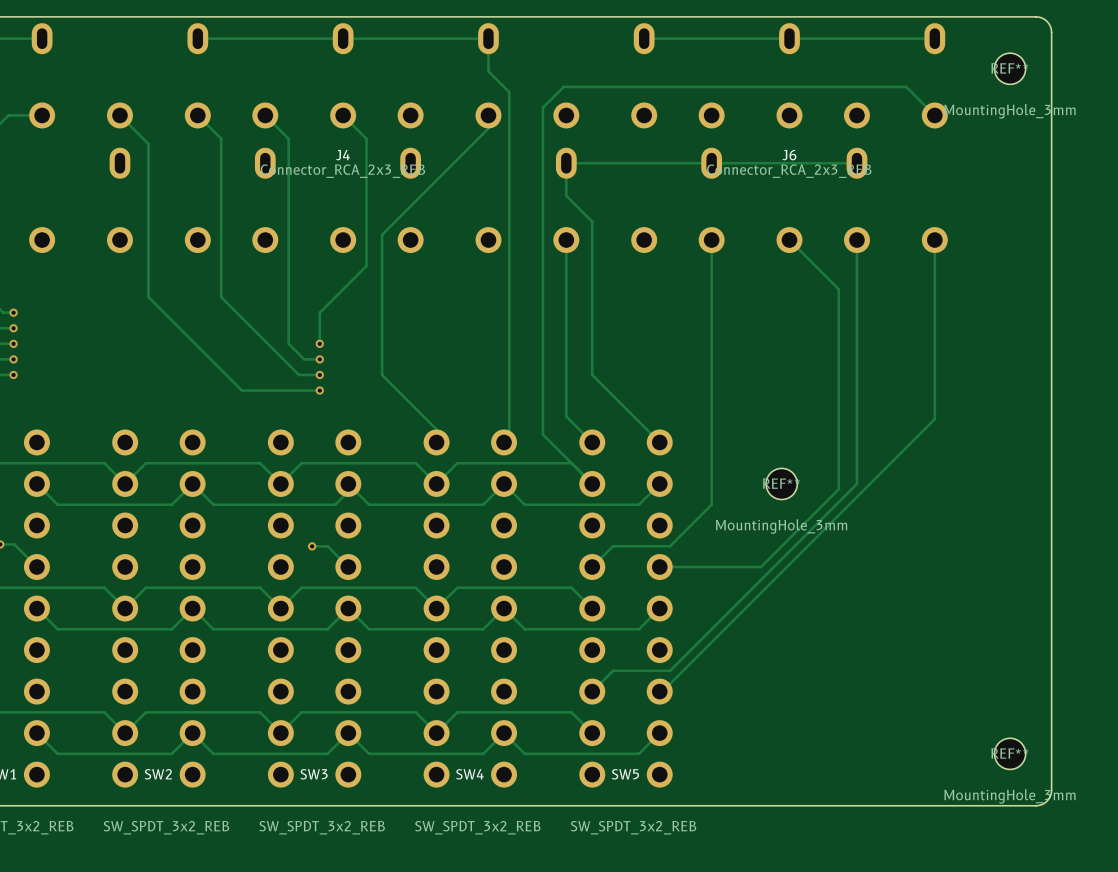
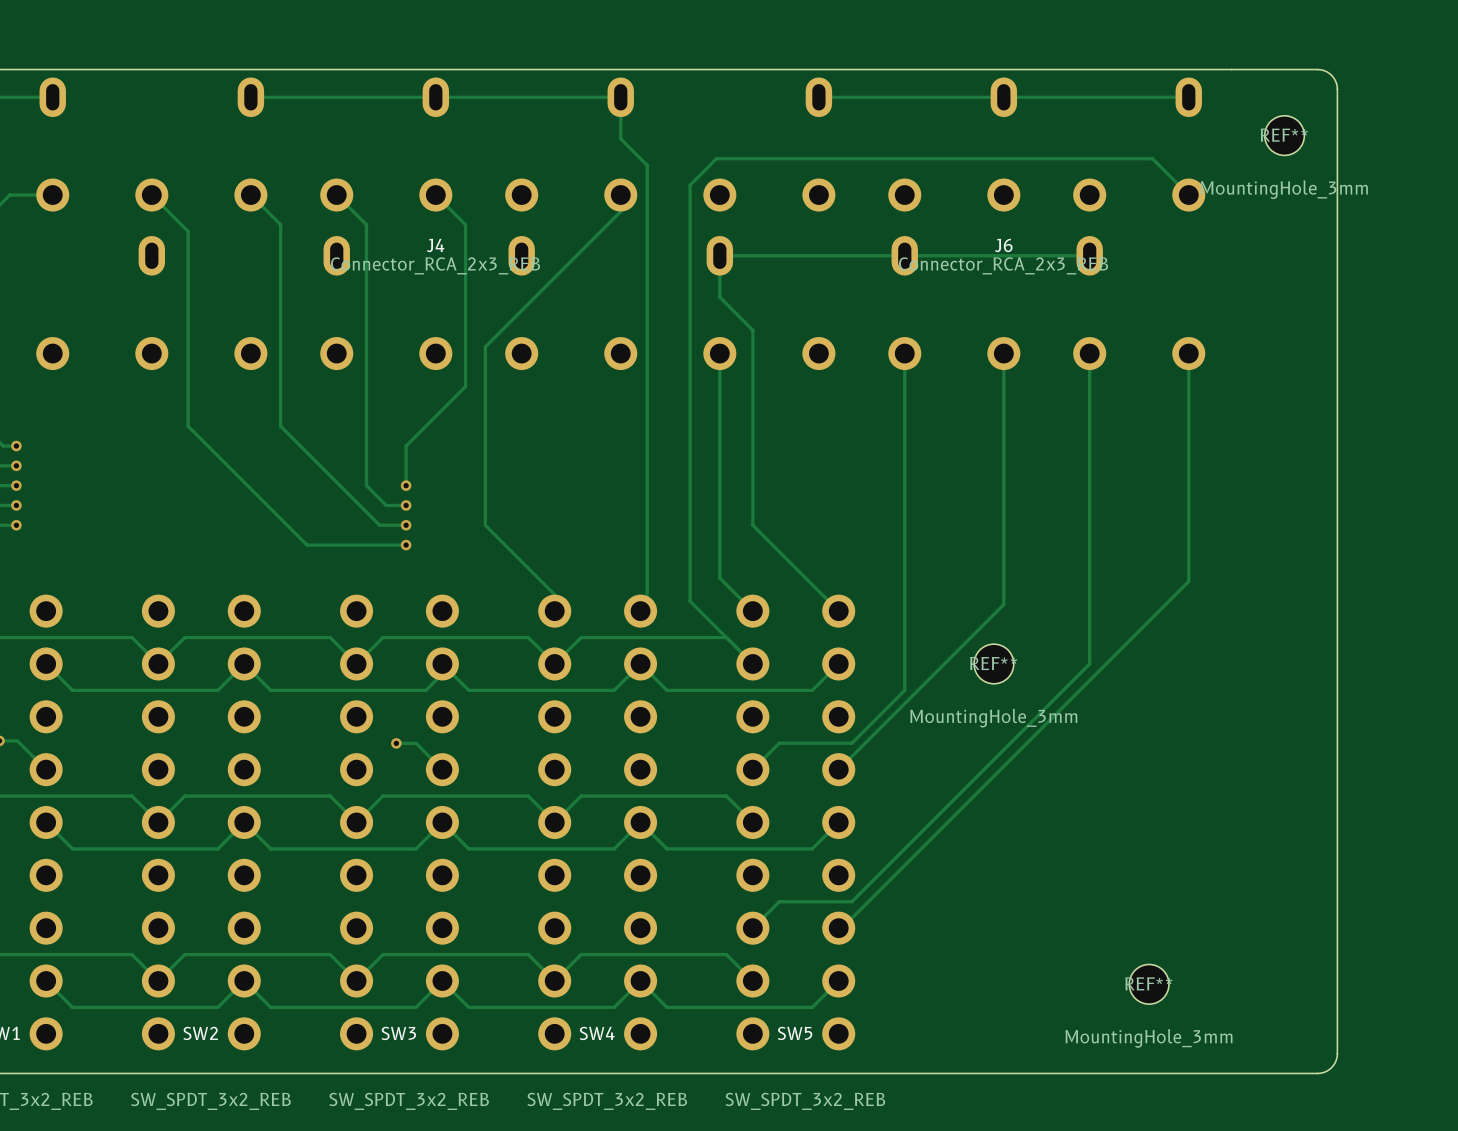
track: (789, 240) (838, 289) (838, 489) (760, 567) (659, 567) -> (1003, 353) (1003, 604) (838, 769)
REF** position: (1010, 753) -> (1149, 984)

